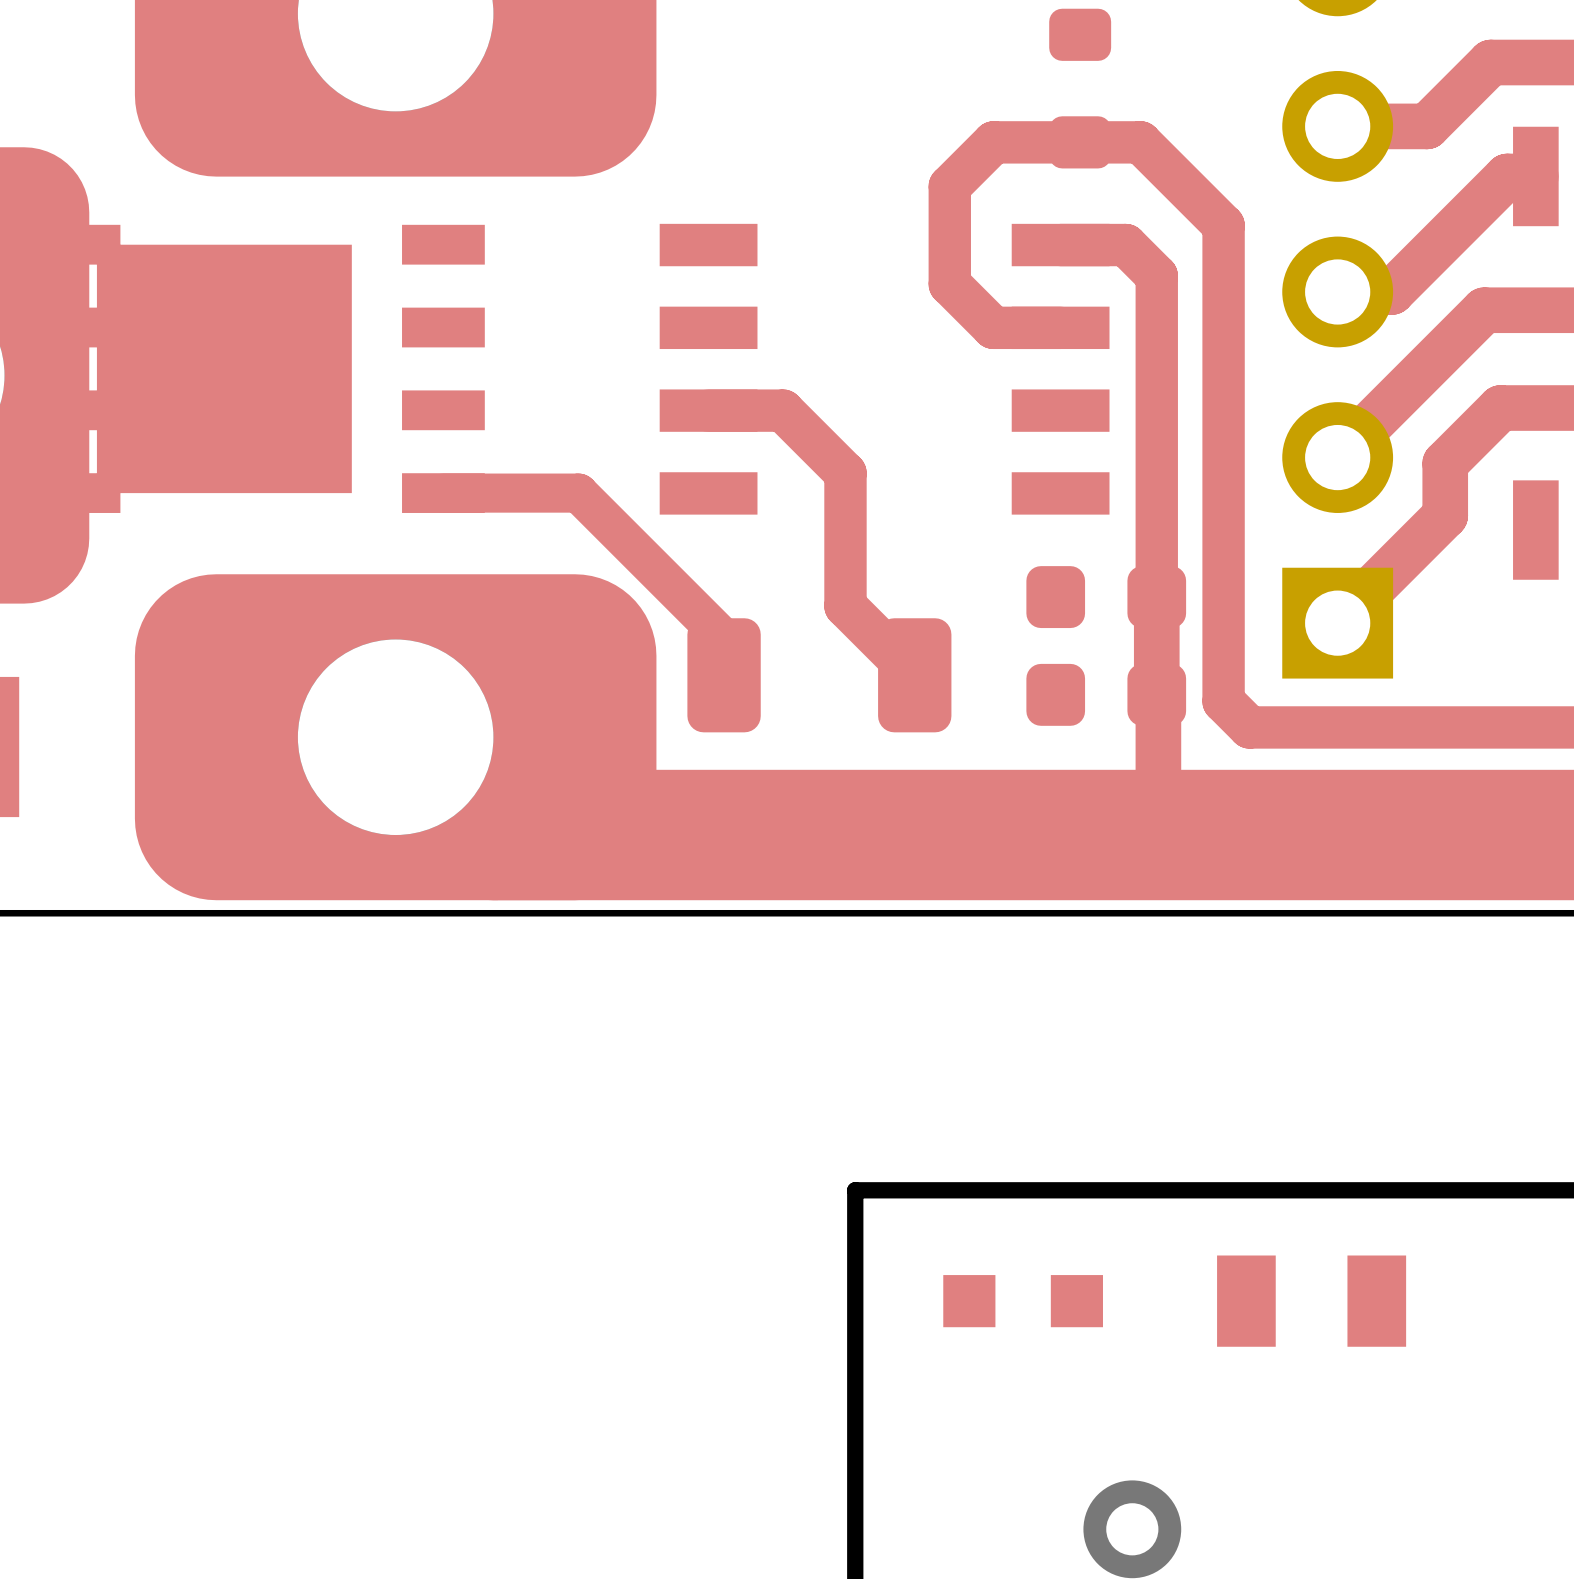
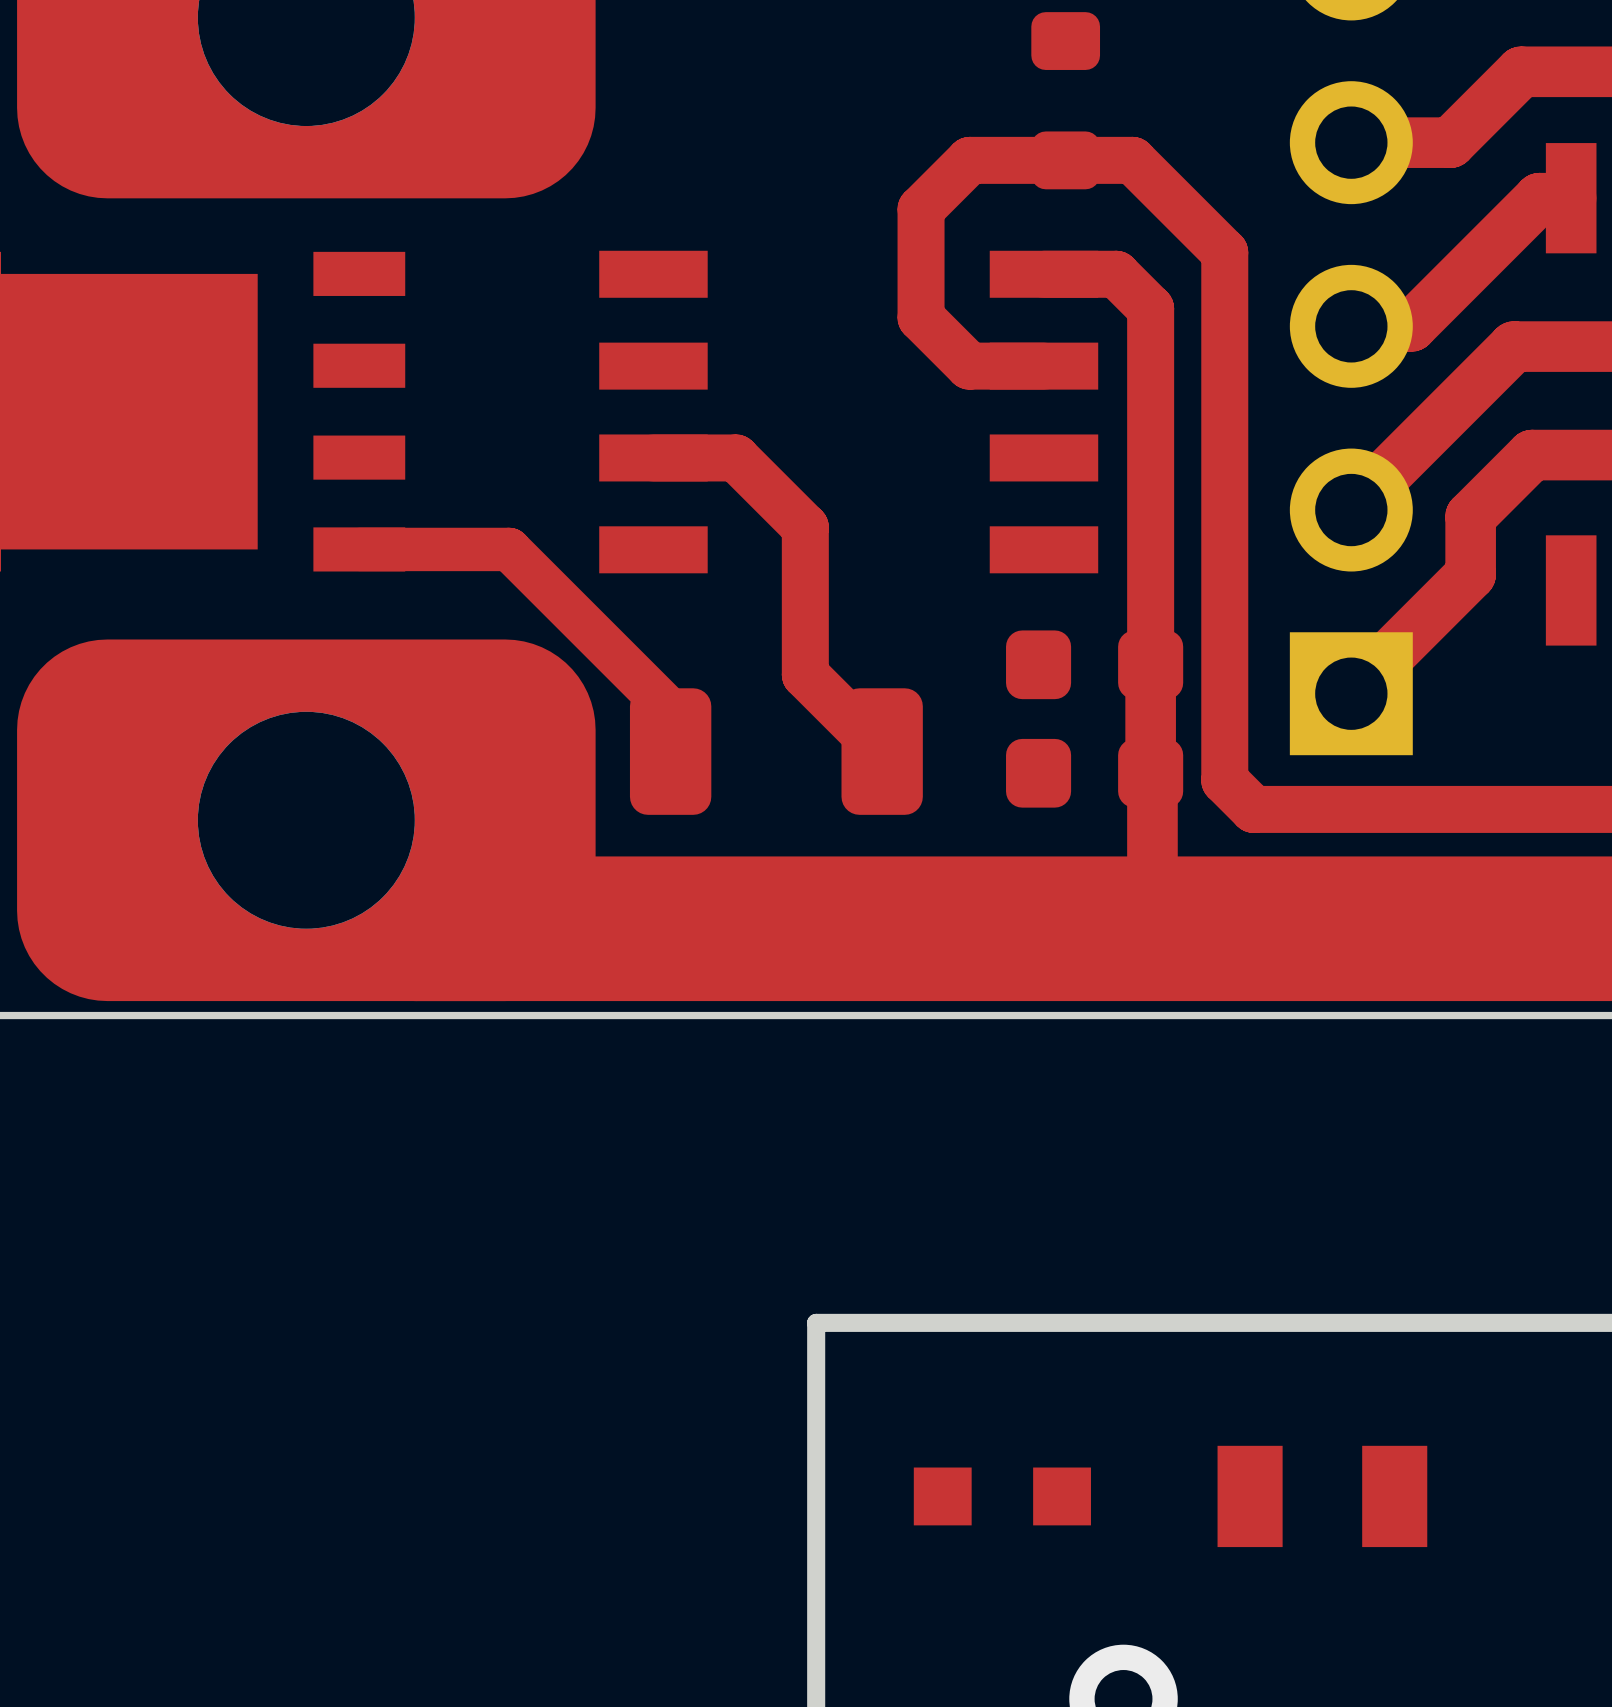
part position: (1023, 1301) -> (1002, 1496)
part position: (1311, 1301) -> (1322, 1496)

